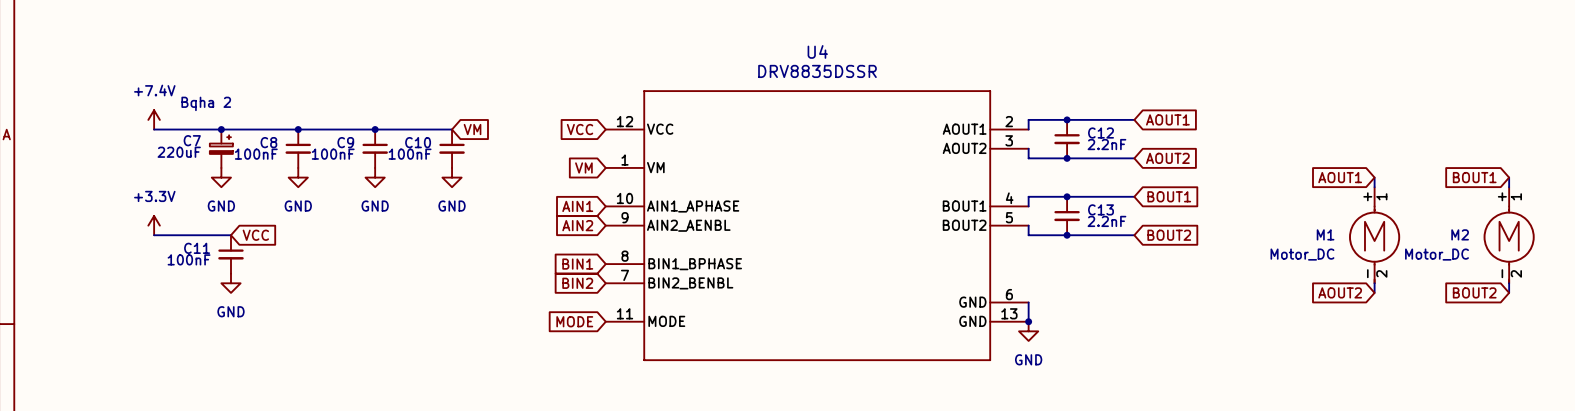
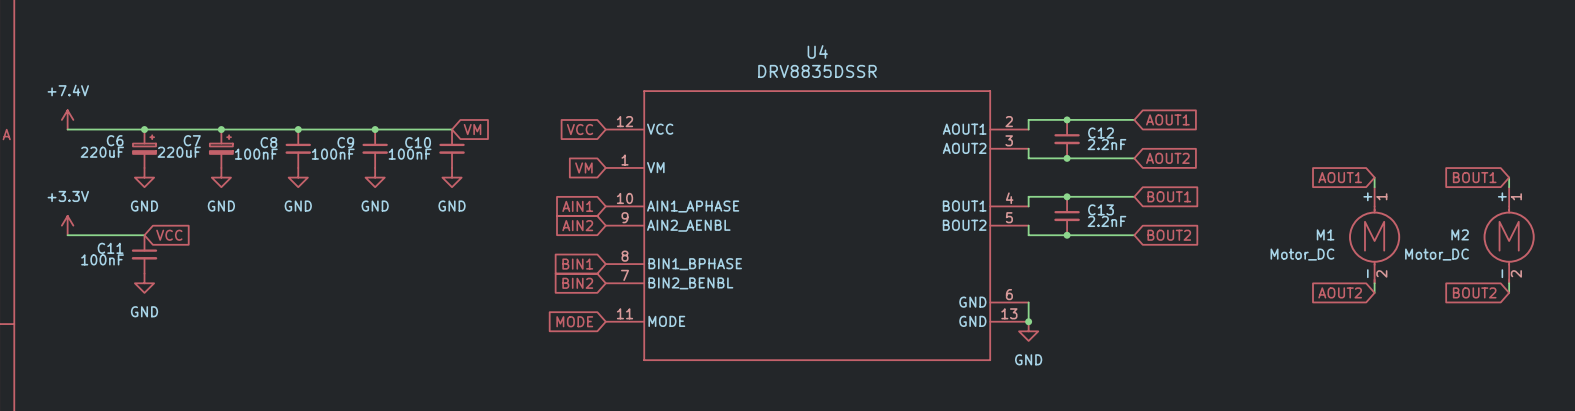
text: Bqha 2 (206, 103) -> none
power symbol position: +7.4V (154, 119) -> +7.4V (67, 119)
wire: none -> (67, 129) (154, 129)
junction: none -> (144, 129)
C6: none -> 220uF (144, 148)
power symbol: none -> GND (144, 177)
power symbol position: +3.3V (154, 225) -> +3.3V (67, 225)
wire: (154, 235) (230, 235) -> (67, 235) (144, 235)
global label position: VCC (255, 235) -> VCC (169, 235)
C11 position: (230, 254) -> (144, 254)
power symbol: none -> GND (144, 283)
power symbol: GND (230, 283) -> none

